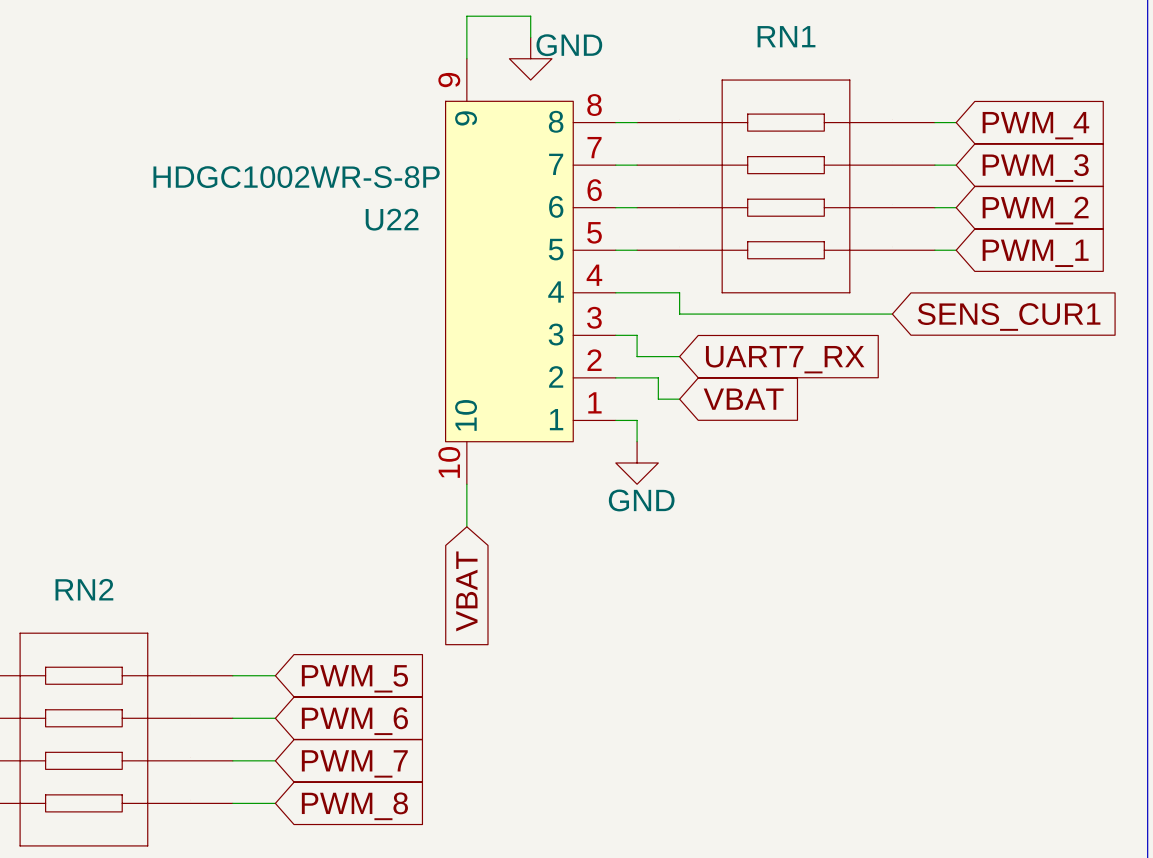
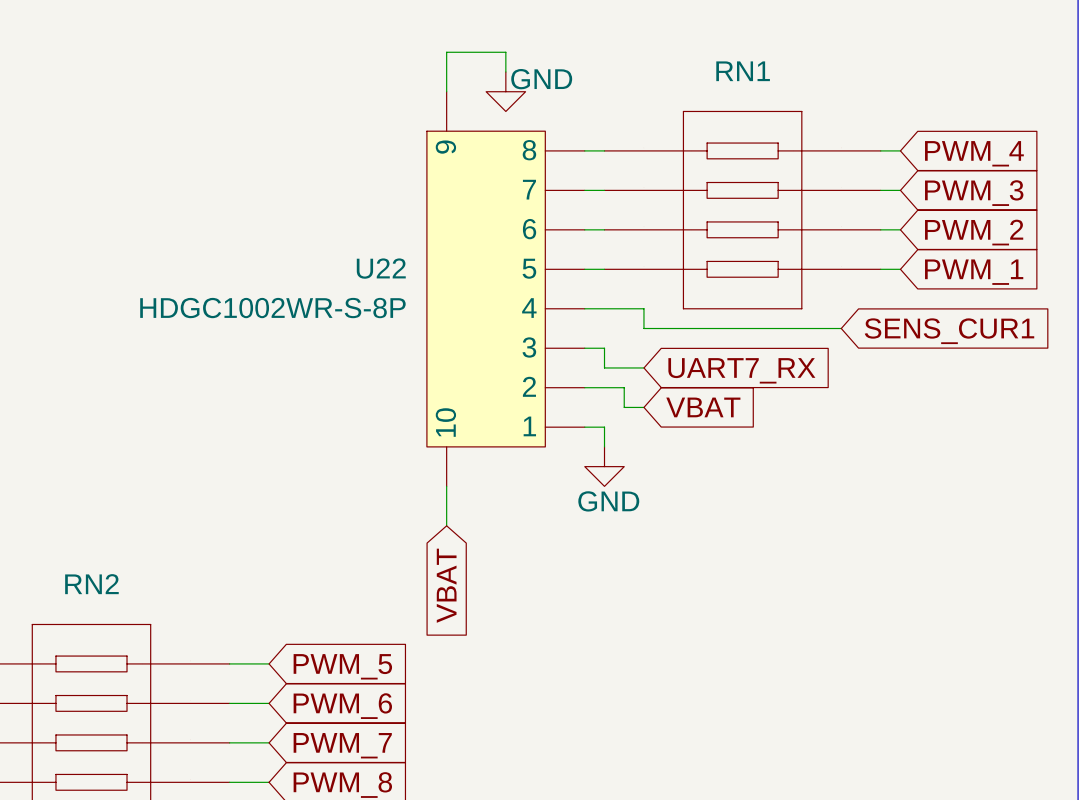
U22 symbol: [445, 58, 616, 485] -> [426, 91, 585, 487]
U22 value position: HDGC1002WR-S-8P (296, 177) -> HDGC1002WR-S-8P (272, 308)

